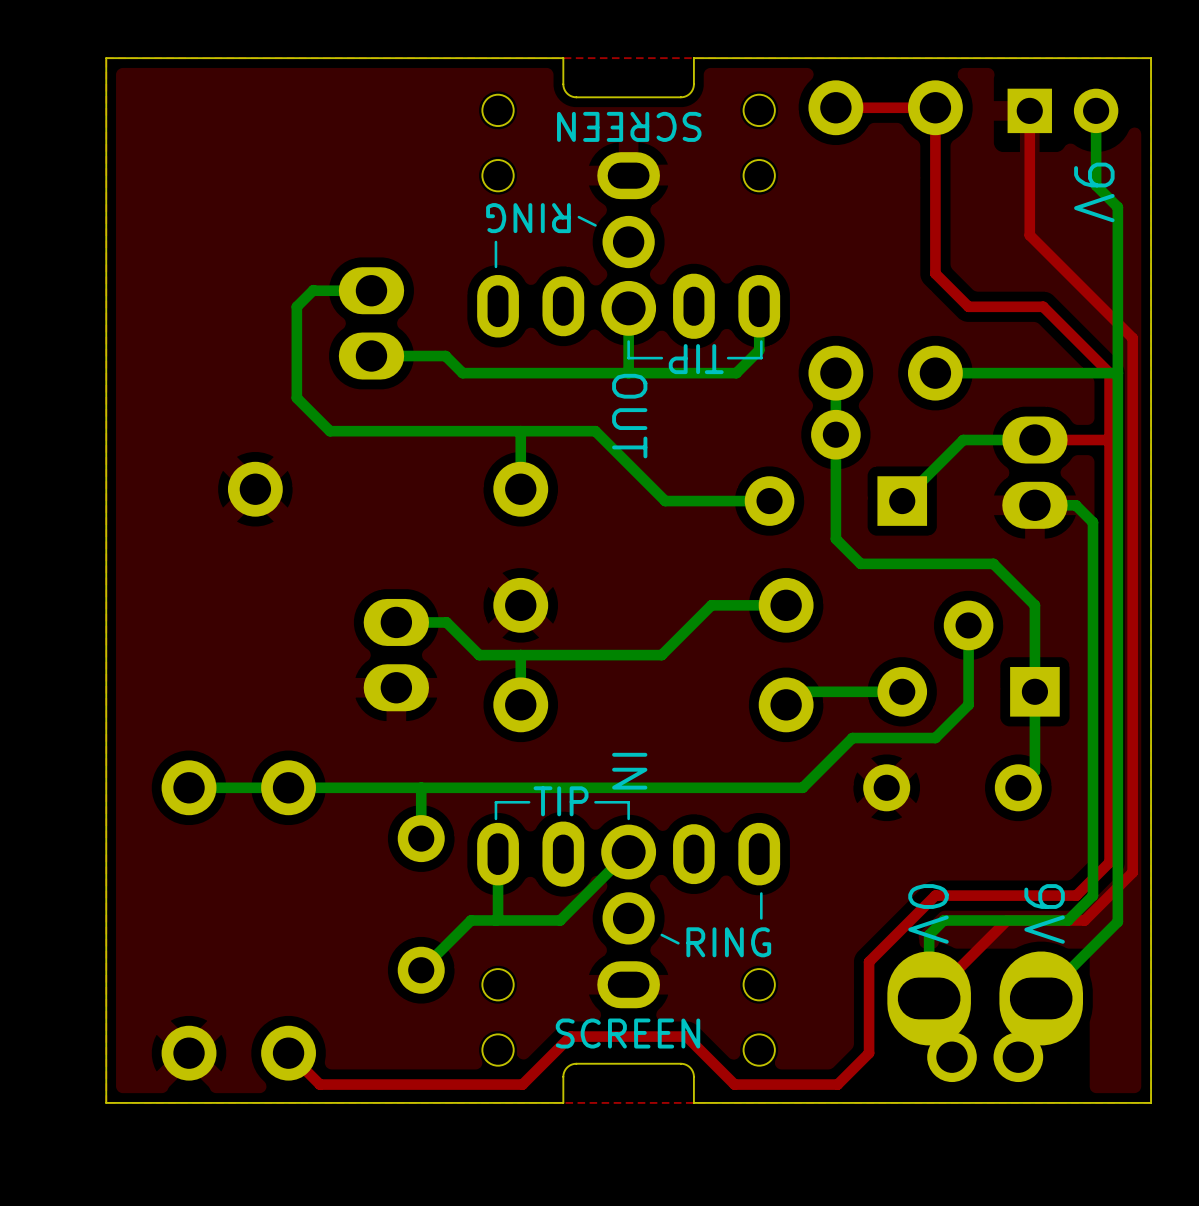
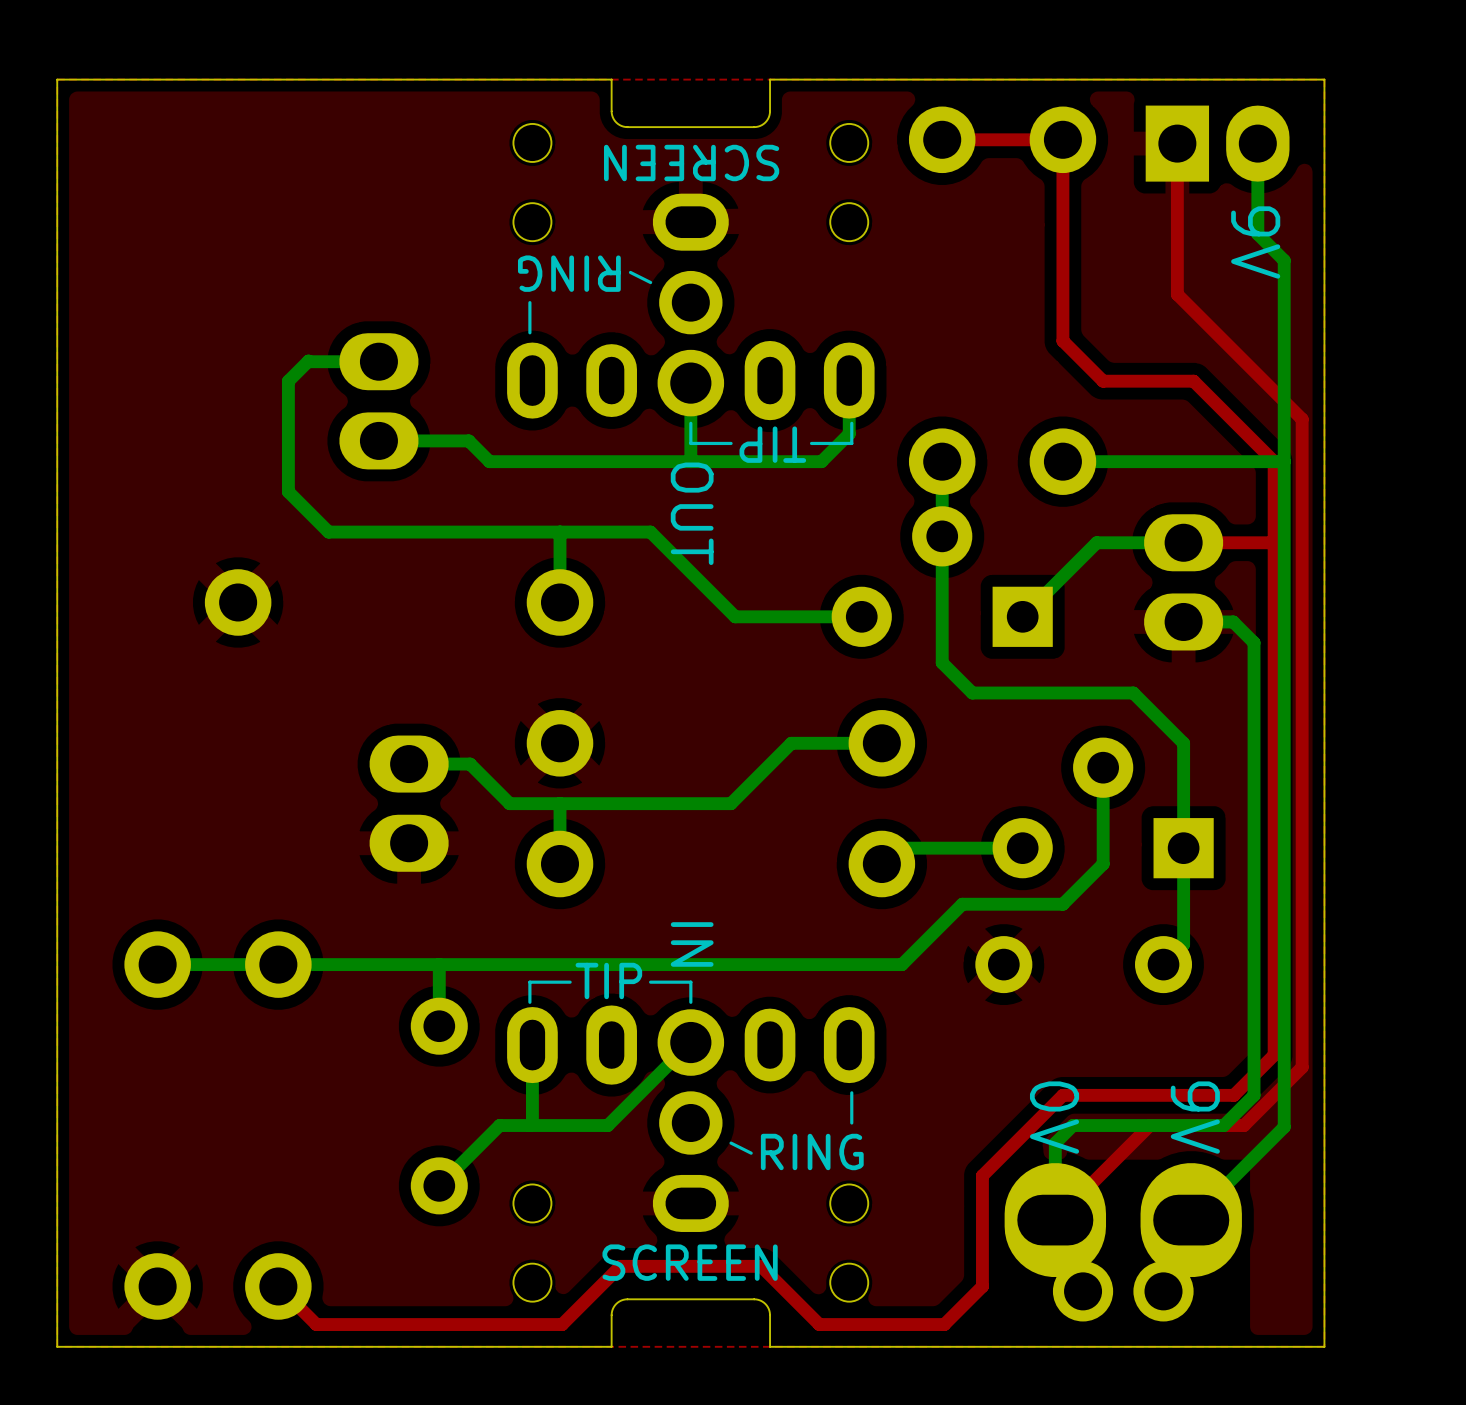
part footprint: [1007, 88, 1119, 134] -> [1145, 105, 1290, 182]

